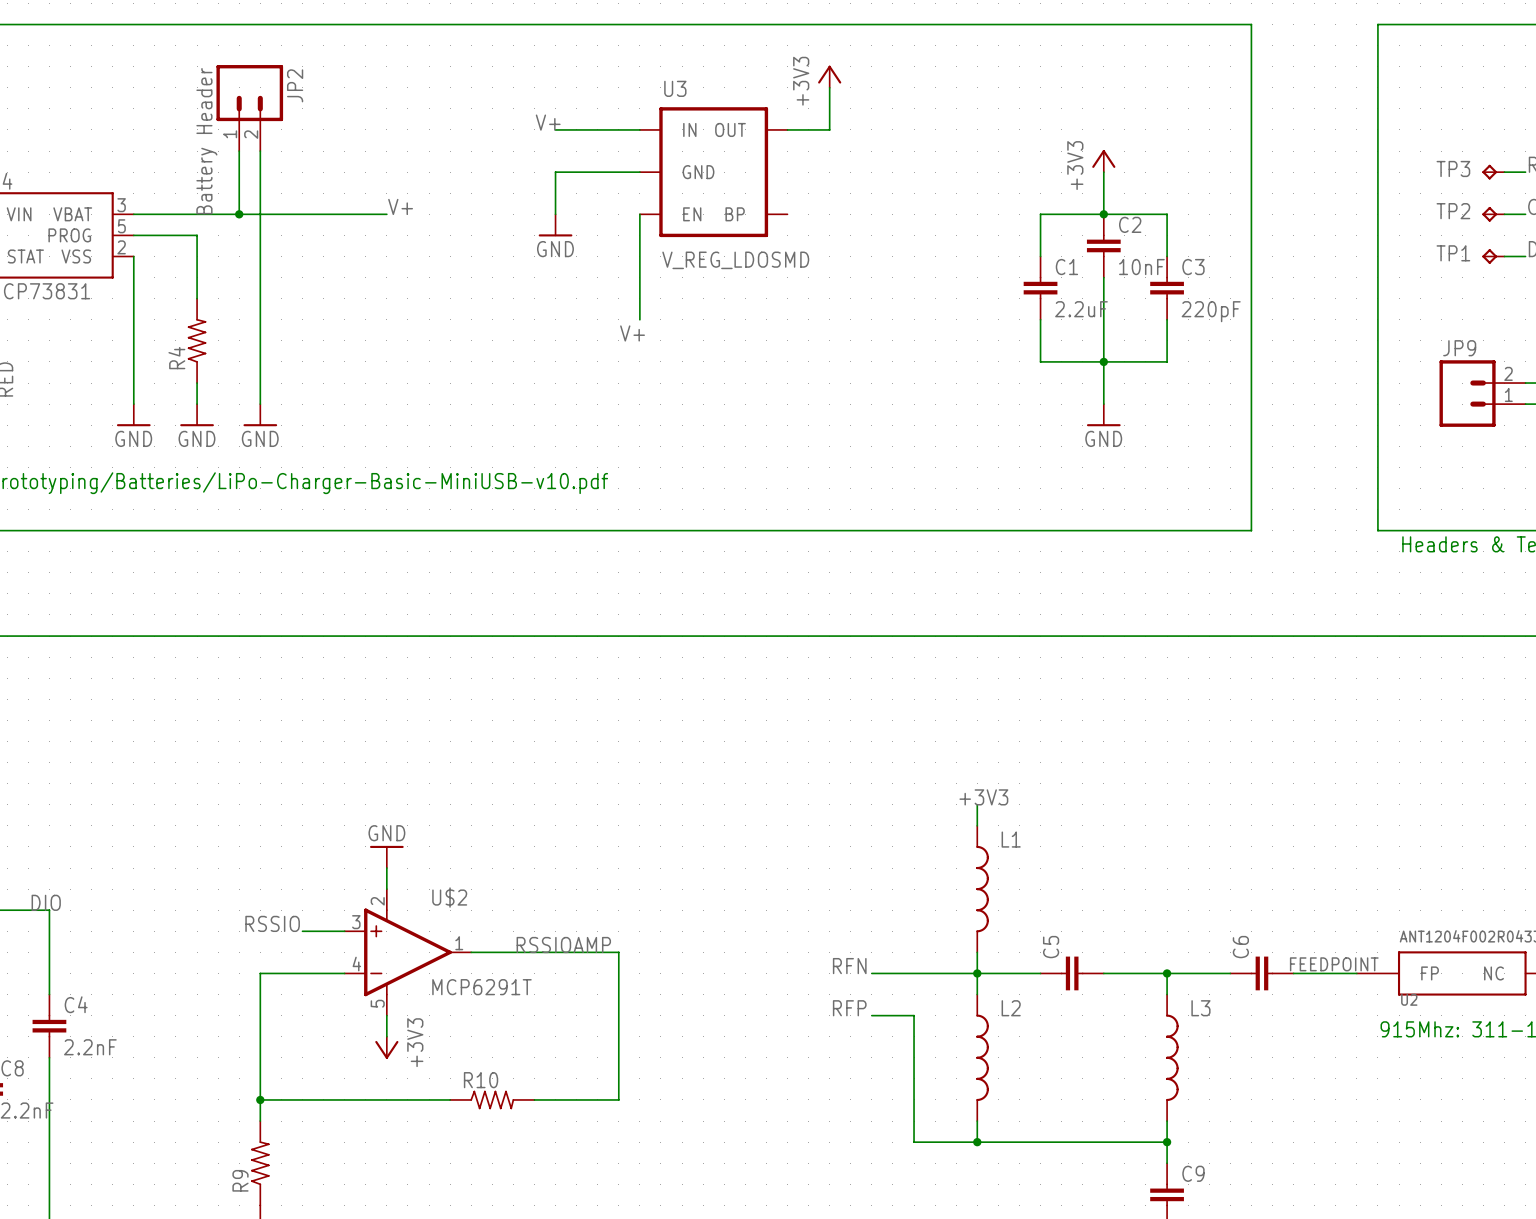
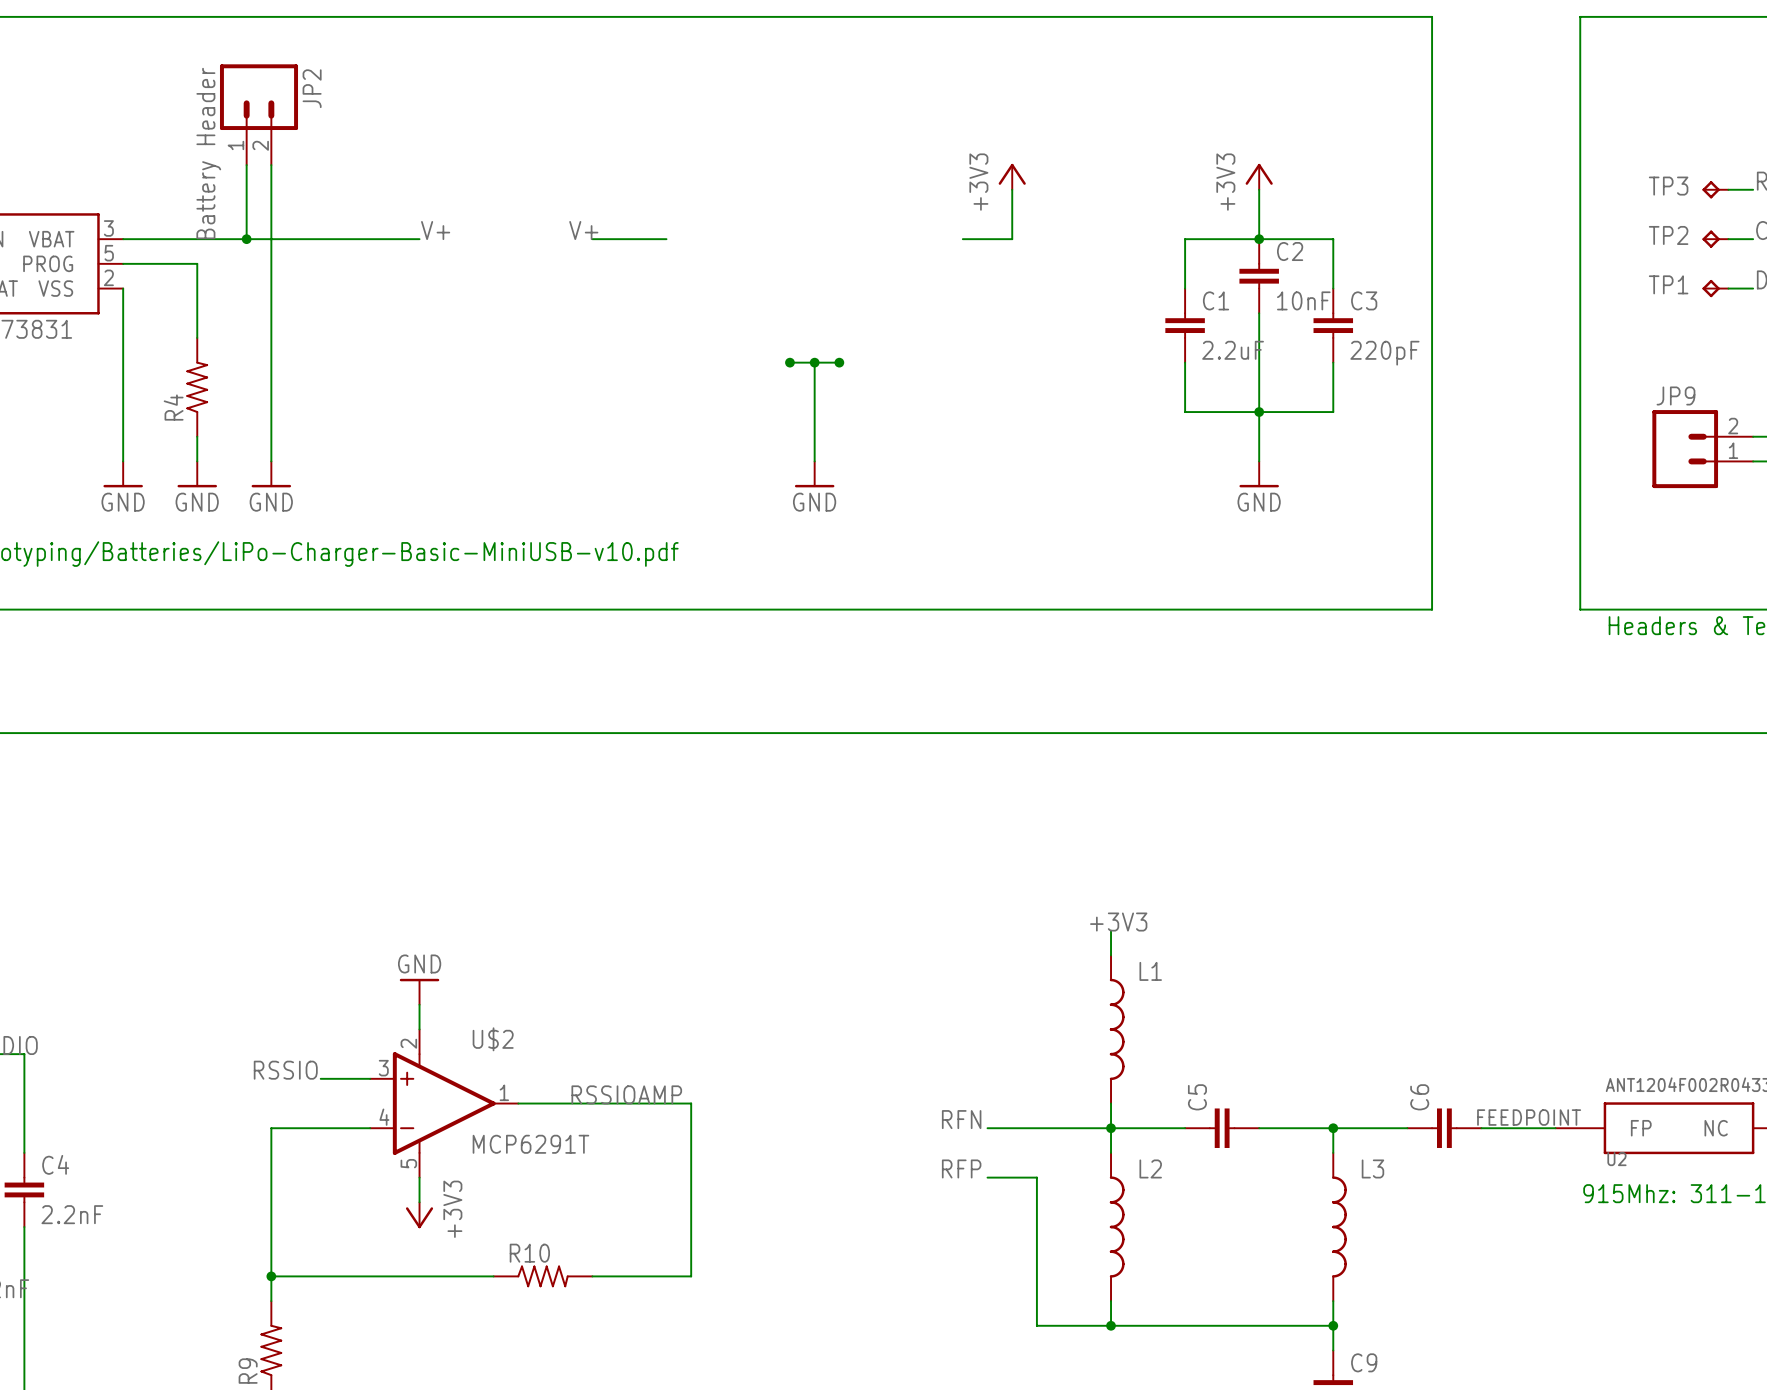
power symbol position: +3V3 (829, 76) -> +3V3 (1012, 176)
wire: (829, 87) (829, 129) (787, 129) -> (1012, 189) (1012, 239) (962, 239)
label: V+ (548, 122) -> none
wire: (555, 129) (639, 129) -> none
wire: (639, 172) (555, 172) (555, 214) -> none
U3: V_REG_LDOSMD (713, 172) -> none
label: none -> V+ (583, 230)
wire: none -> (592, 239) (666, 239)
wire: (639, 214) (639, 319) -> none
power symbol: GND (555, 225) -> none
wire: none -> (789, 362) (839, 362)
junction: none -> (789, 362)
wire: none -> (814, 362) (814, 461)
junction: none -> (814, 362)
junction: none -> (839, 362)
label: V+ (632, 333) -> none
power symbol: none -> GND (814, 474)

